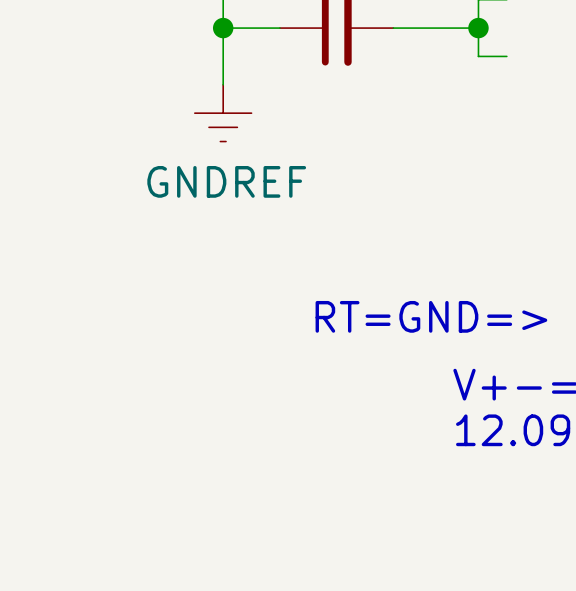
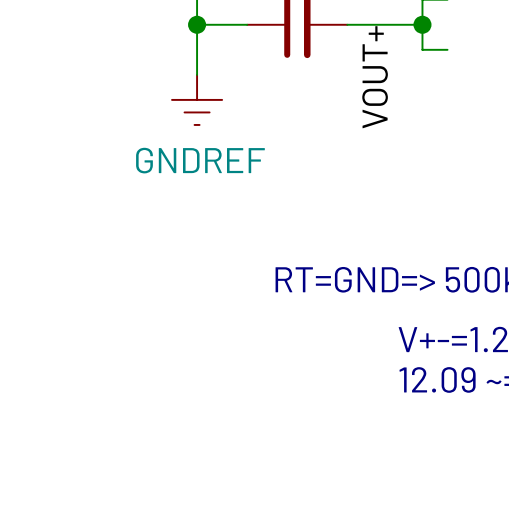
label: none -> VOUT+ (375, 77)

